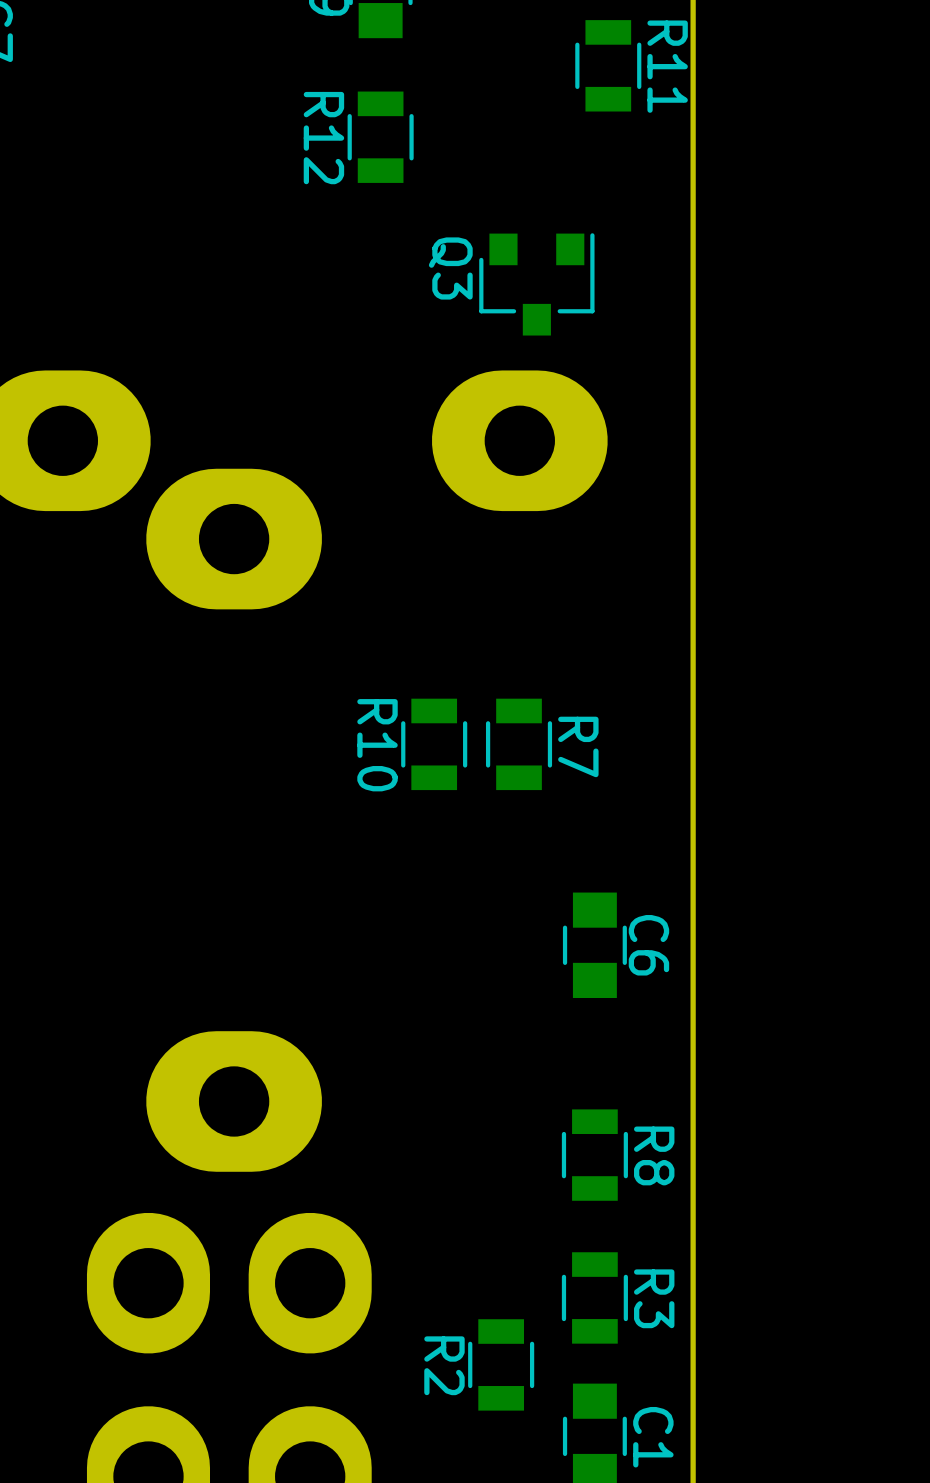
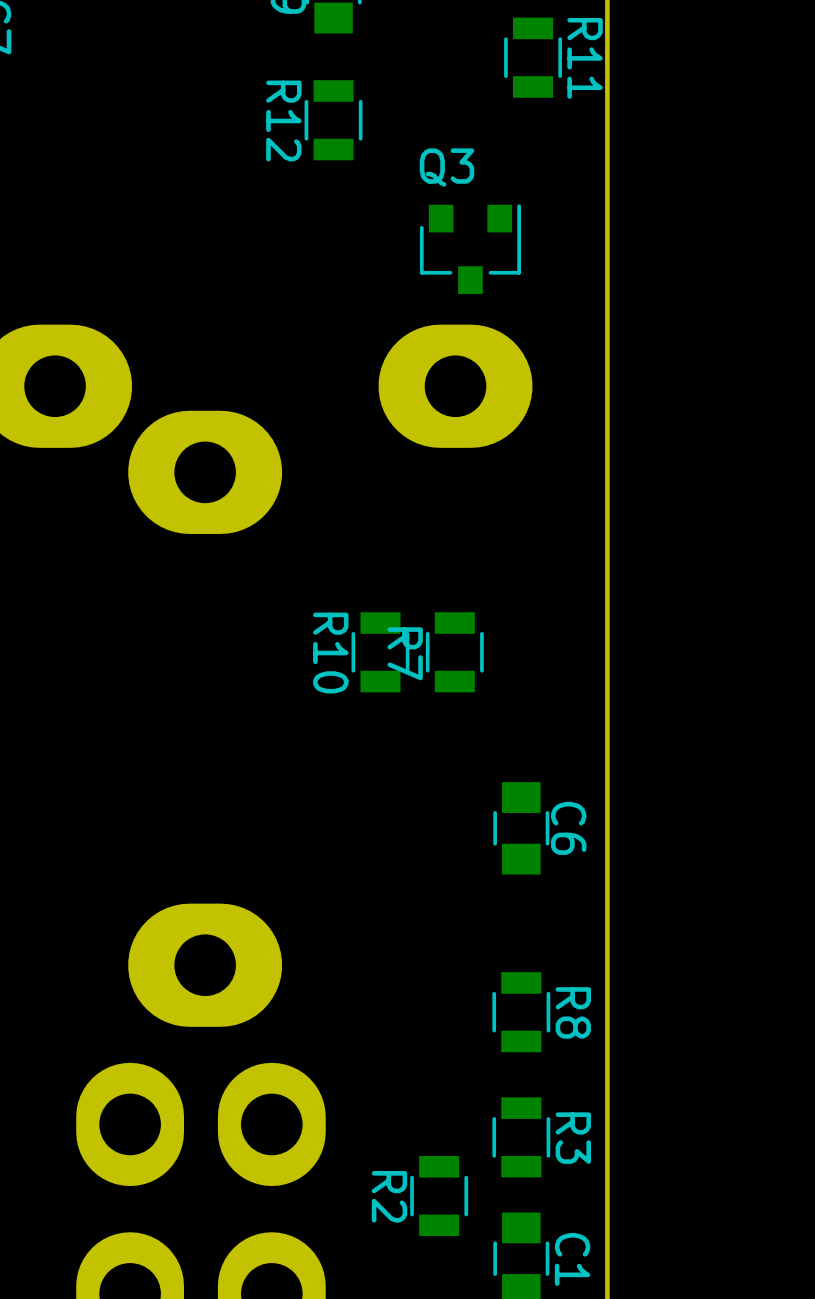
Q3 name rotation: 0° (450, 268) -> 90° counterclockwise (446, 167)
Q3 name position: Q3 (450, 268) -> Q3 (446, 167)
R7 name position: R7 (578, 746) -> R7 (405, 653)

